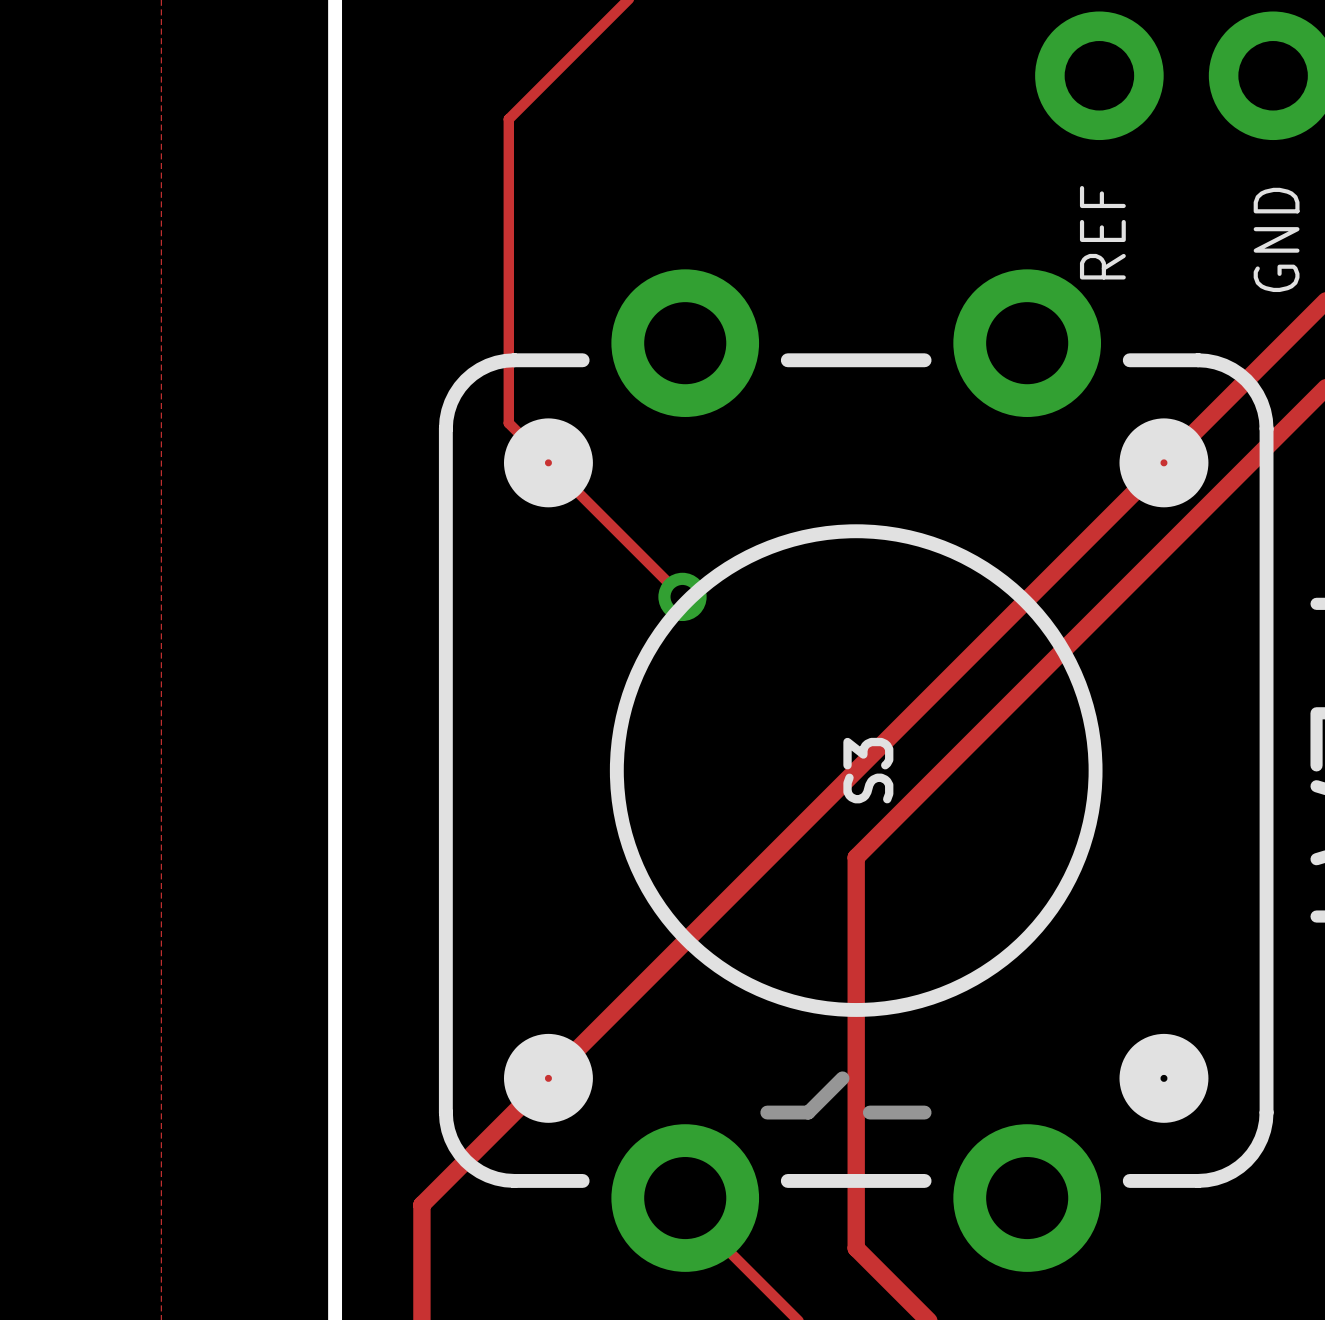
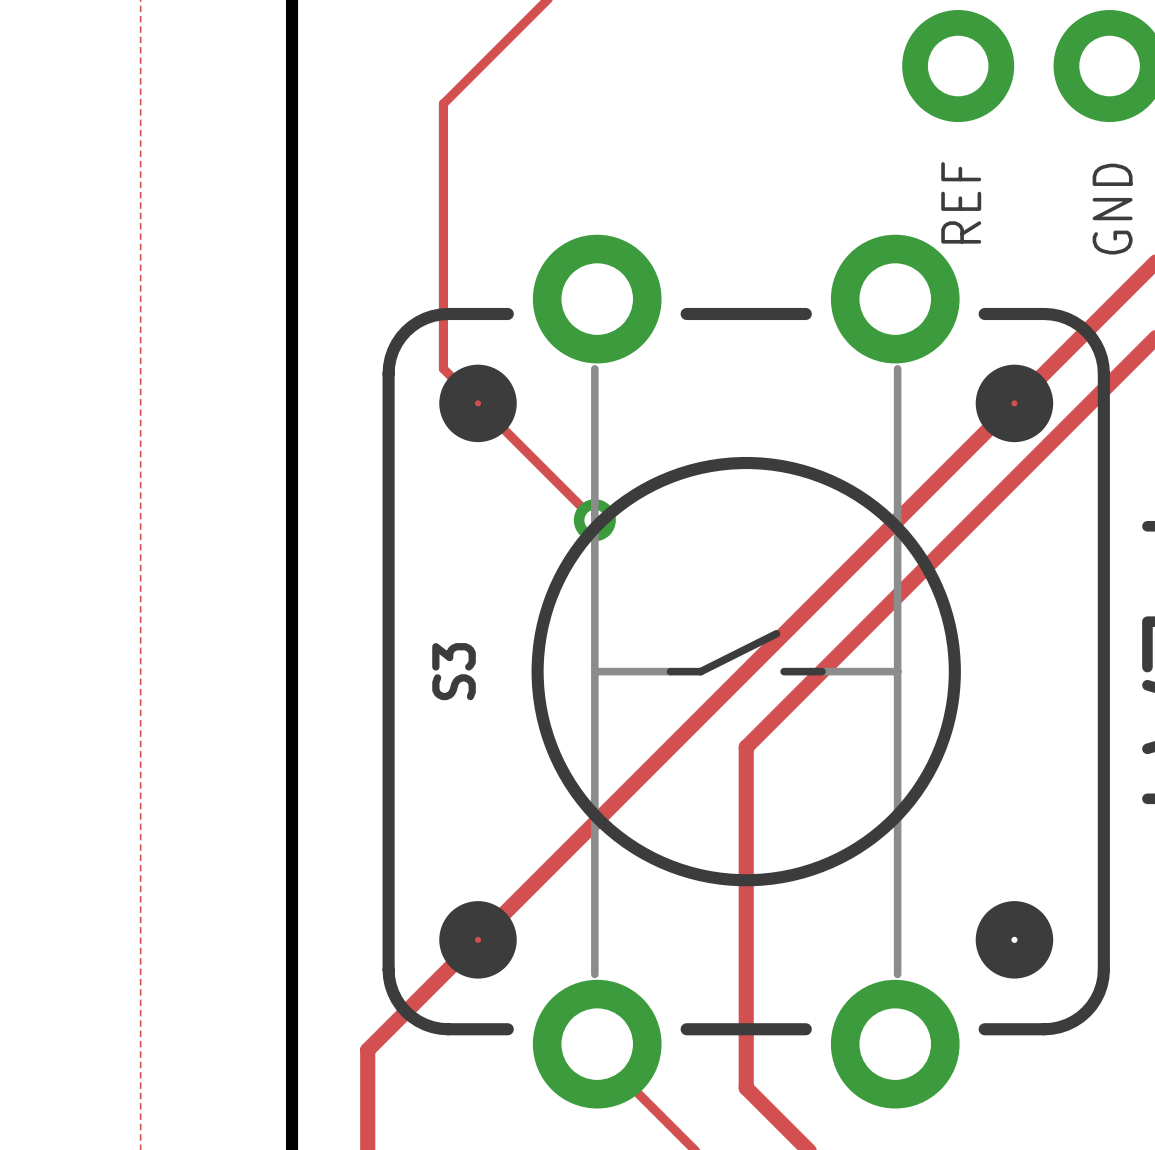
S3 footprint: [438, 269, 1274, 1272] -> [382, 234, 1110, 1109]
S3 name position: S3 (868, 770) -> S3 (454, 671)

